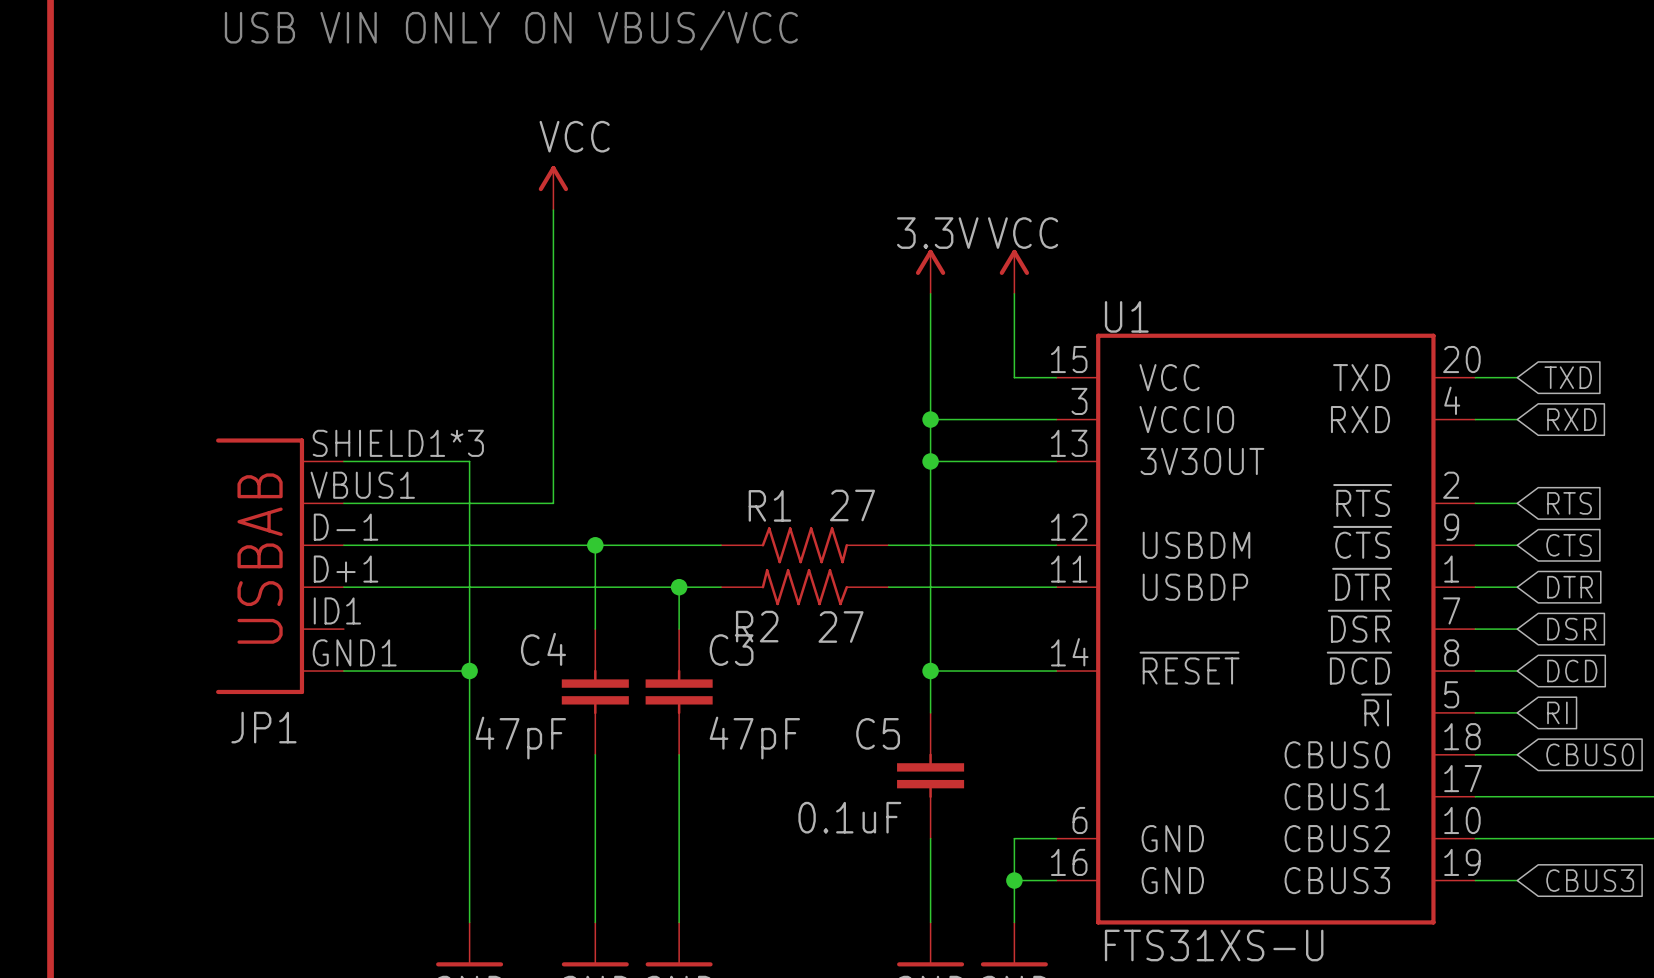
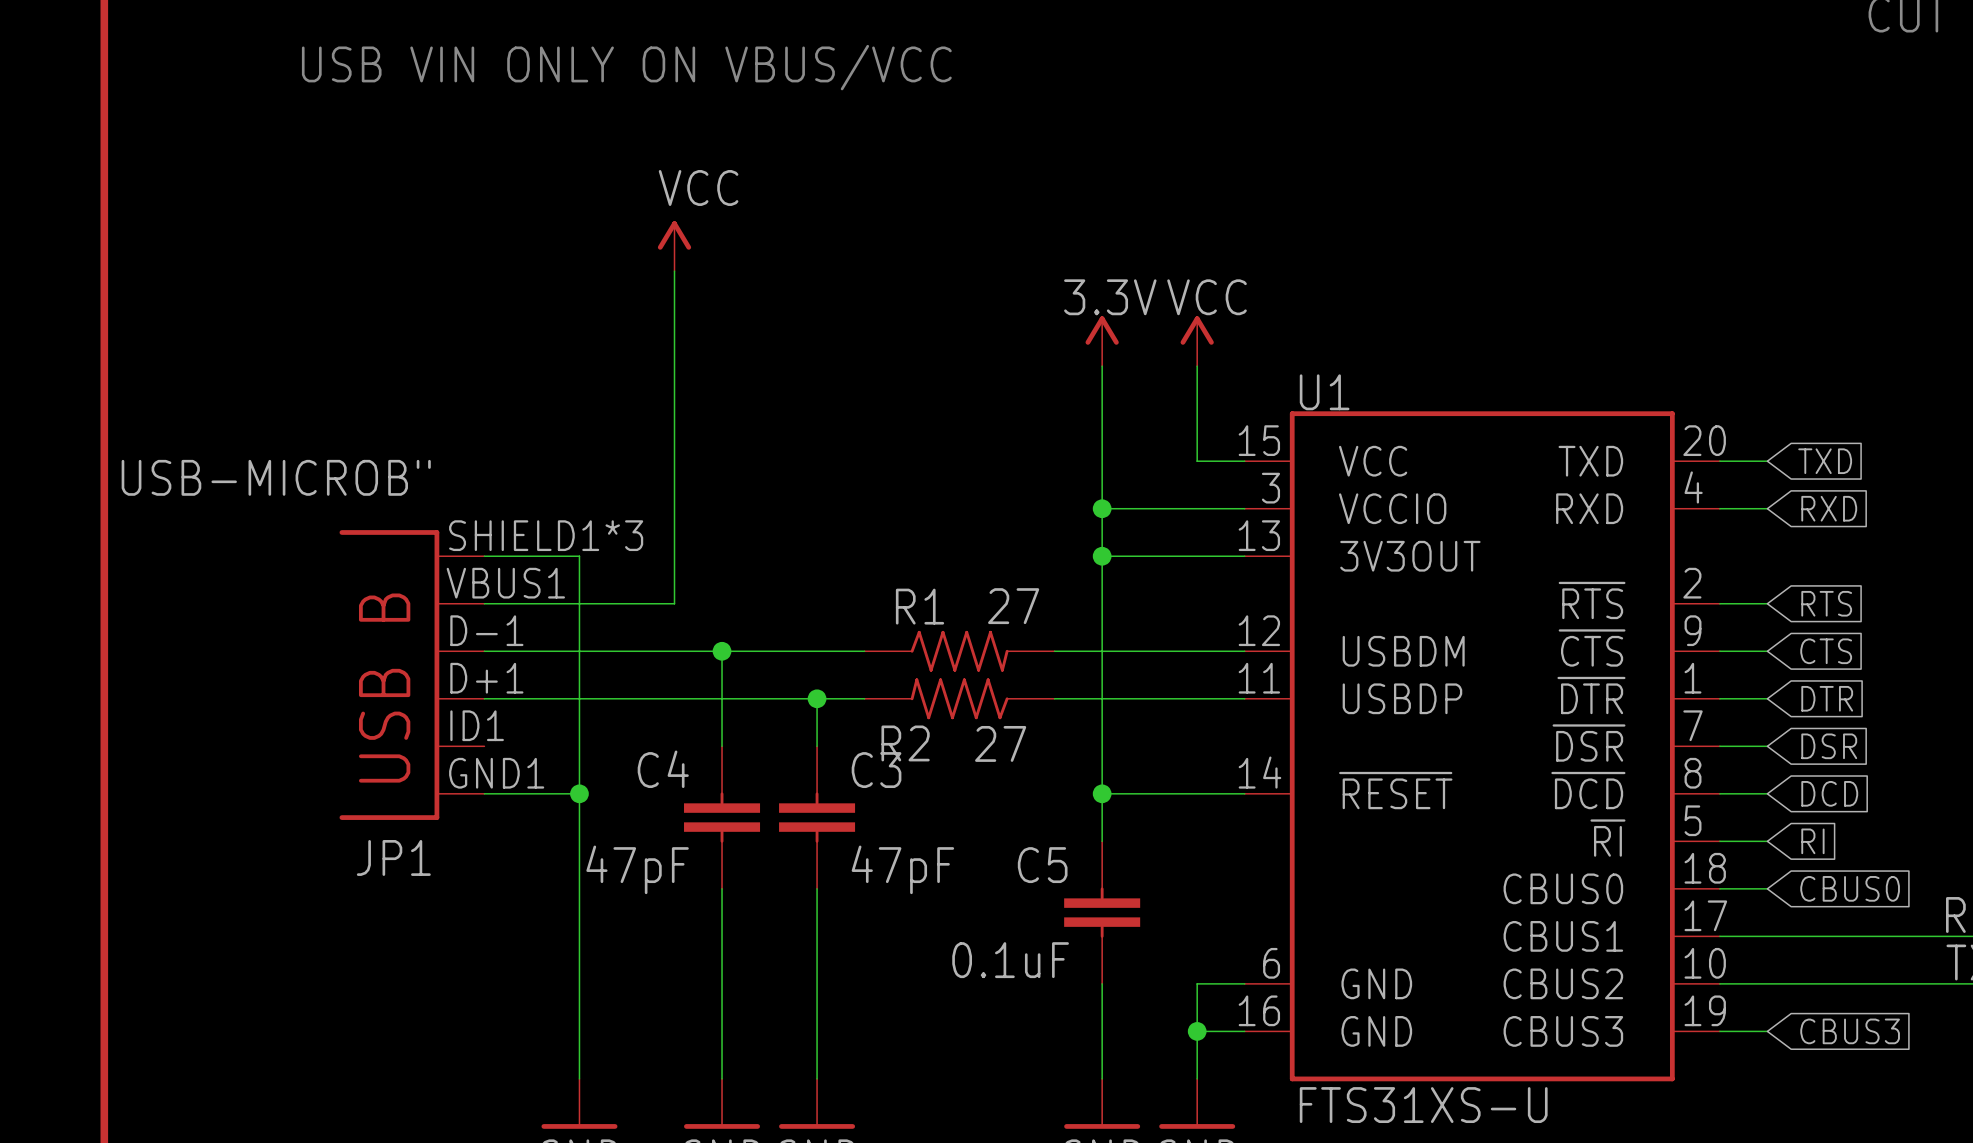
JP1 value: none -> USB-MICROB" (276, 477)
JP1 text: USBAB (260, 558) -> none
JP1 position: (279, 566) -> (411, 675)
JP1 text: none -> USB B (384, 688)

